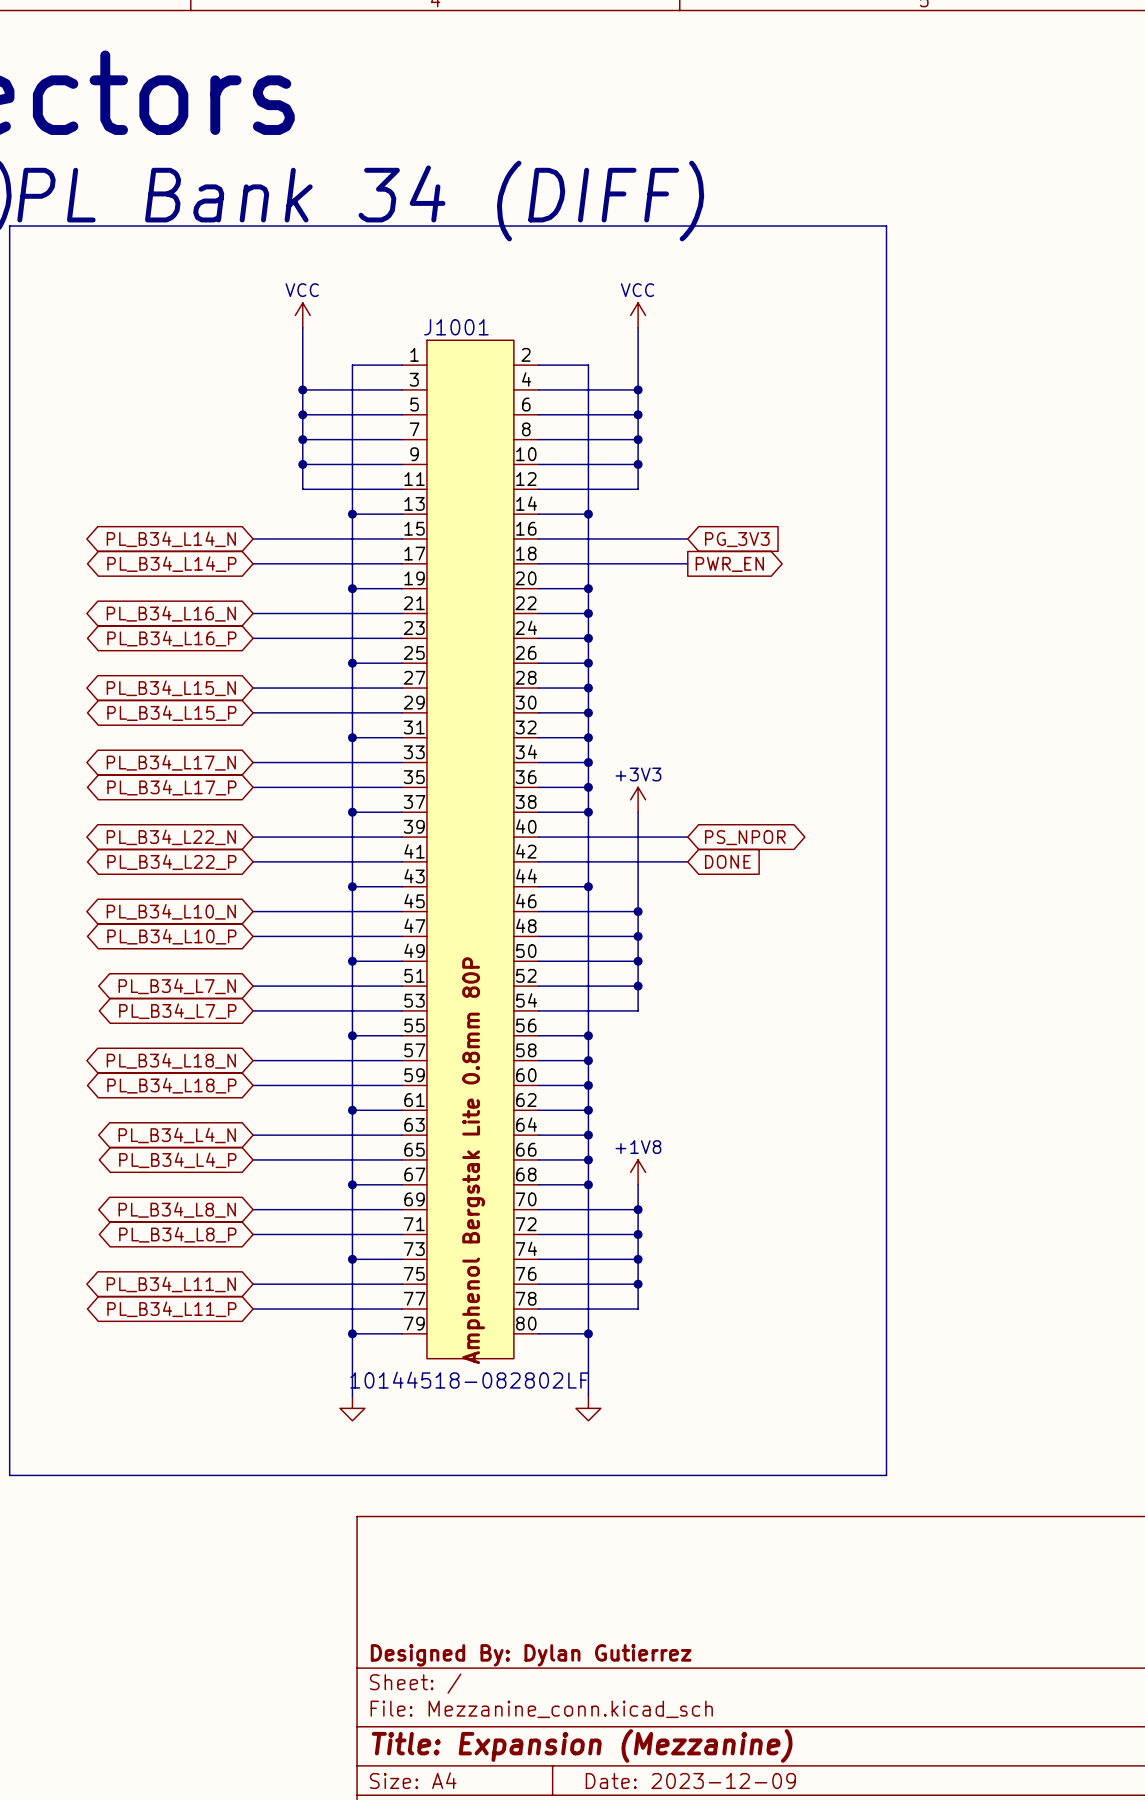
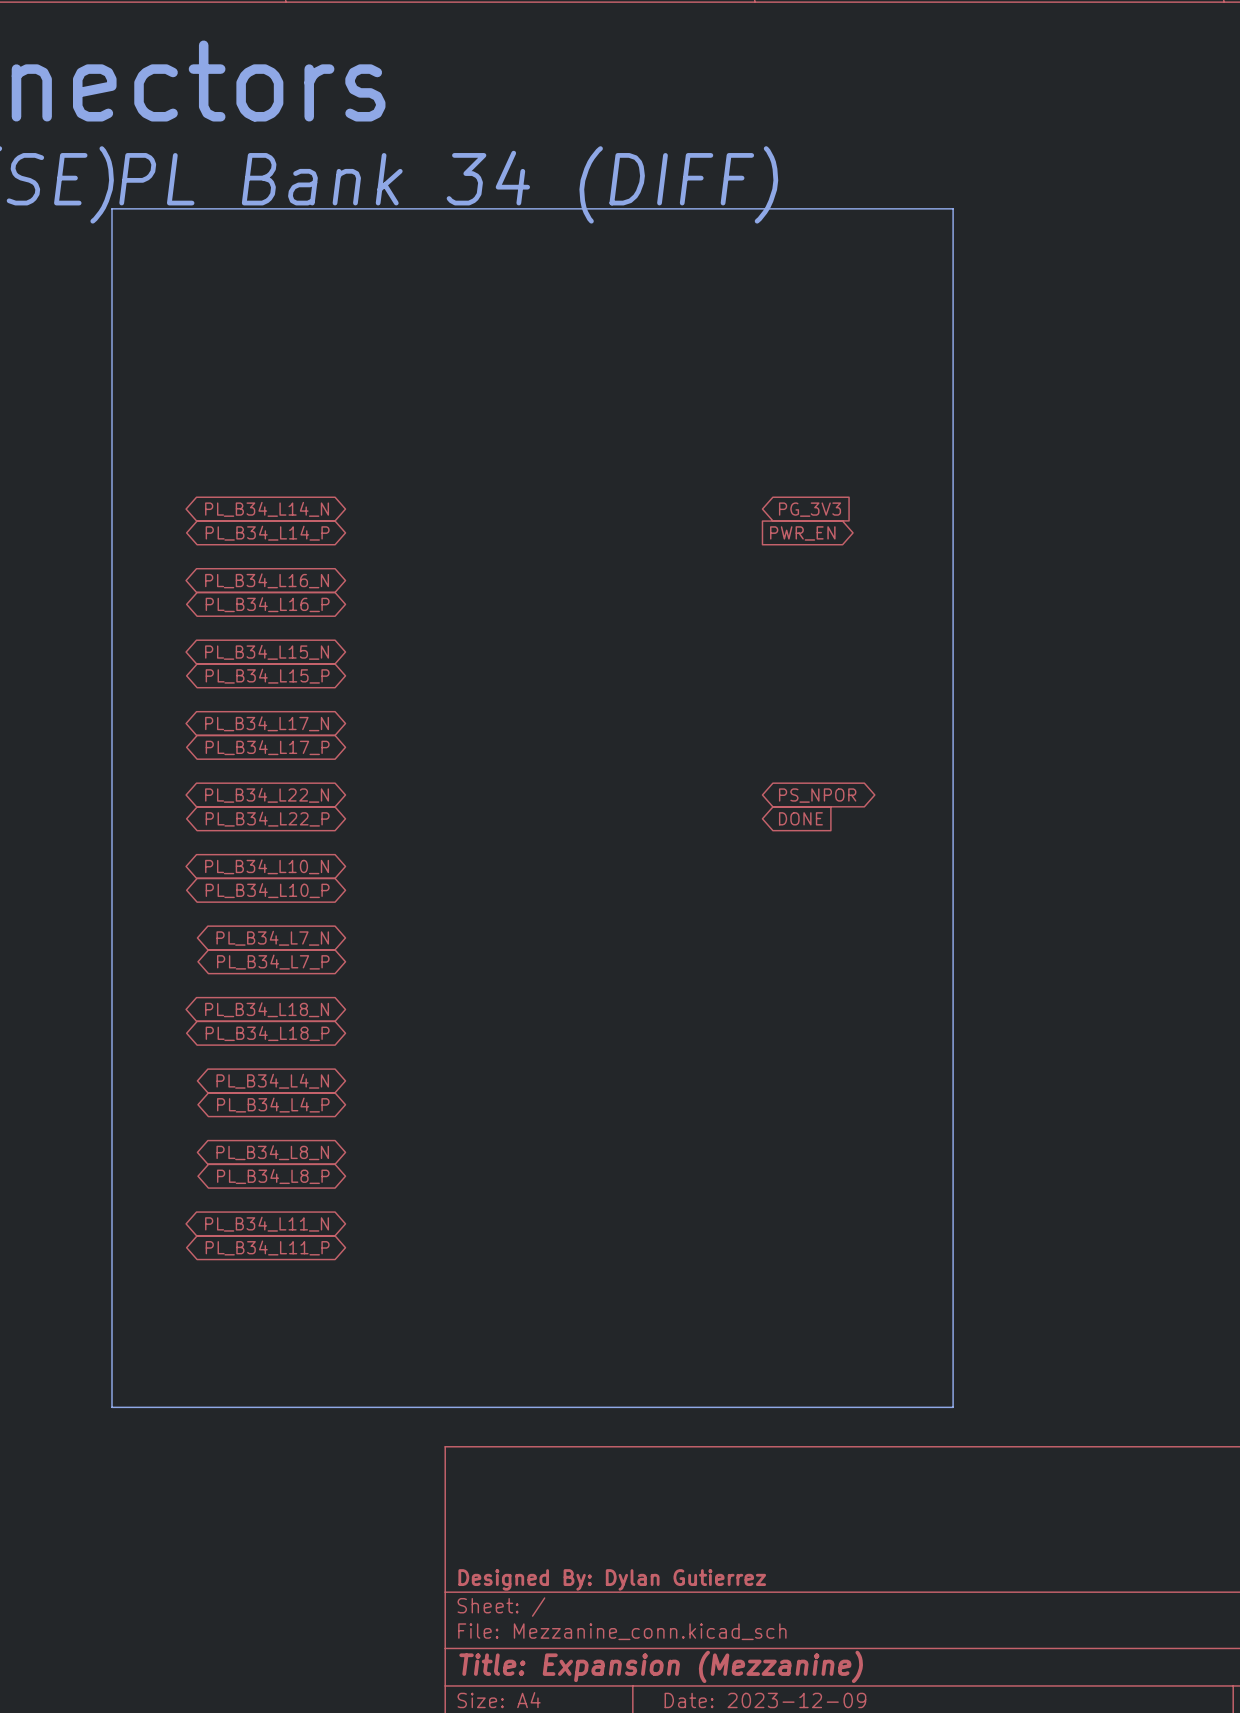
power symbol: VCC (302, 315) -> none
power symbol: VCC (638, 315) -> none
wire: (302, 327) (302, 489) (402, 489) -> none
wire: (638, 327) (638, 489) (538, 489) -> none
wire: (402, 365) (352, 365) (352, 1395) -> none
wire: (538, 365) (588, 365) (588, 1395) -> none
wire: (302, 389) (402, 389) -> none
junction: (302, 389) -> none
wire: (538, 389) (638, 389) -> none
junction: (638, 389) -> none
wire: (302, 414) (402, 414) -> none
junction: (302, 414) -> none
wire: (538, 414) (638, 414) -> none
junction: (638, 414) -> none
wire: (302, 439) (402, 439) -> none
junction: (302, 439) -> none
wire: (538, 439) (638, 439) -> none
junction: (638, 439) -> none
wire: (302, 464) (402, 464) -> none
junction: (302, 464) -> none
wire: (538, 464) (638, 464) -> none
junction: (638, 464) -> none
wire: (352, 514) (402, 514) -> none
junction: (352, 514) -> none
wire: (538, 514) (588, 514) -> none
junction: (588, 514) -> none
wire: (253, 538) (402, 538) -> none
wire: (538, 538) (687, 538) -> none
wire: (253, 563) (402, 563) -> none
wire: (538, 563) (687, 563) -> none
wire: (352, 588) (402, 588) -> none
junction: (352, 588) -> none
wire: (538, 588) (588, 588) -> none
junction: (588, 588) -> none
wire: (253, 613) (402, 613) -> none
wire: (538, 613) (588, 613) -> none
junction: (588, 613) -> none
wire: (253, 638) (402, 638) -> none
wire: (538, 638) (588, 638) -> none
junction: (588, 638) -> none
wire: (352, 663) (402, 663) -> none
junction: (352, 663) -> none
wire: (538, 663) (588, 663) -> none
junction: (588, 663) -> none
wire: (253, 688) (402, 688) -> none
wire: (538, 688) (588, 688) -> none
junction: (588, 688) -> none
wire: (253, 712) (402, 712) -> none
wire: (538, 712) (588, 712) -> none
junction: (588, 712) -> none
wire: (352, 737) (402, 737) -> none
junction: (352, 737) -> none
wire: (538, 737) (588, 737) -> none
junction: (588, 737) -> none
wire: (253, 762) (402, 762) -> none
wire: (538, 762) (588, 762) -> none
junction: (588, 762) -> none
wire: (253, 787) (402, 787) -> none
wire: (538, 787) (588, 787) -> none
junction: (588, 787) -> none
power symbol: +3V3 (638, 799) -> none
wire: (352, 812) (402, 812) -> none
junction: (352, 812) -> none
wire: (538, 812) (588, 812) -> none
junction: (588, 812) -> none
wire: (638, 812) (638, 1010) (538, 1010) -> none
wire: (253, 837) (402, 837) -> none
wire: (538, 837) (687, 837) -> none
J1001: 10144518-082802LF (470, 849) -> none
wire: (253, 861) (402, 861) -> none
wire: (538, 861) (687, 861) -> none
wire: (352, 886) (402, 886) -> none
junction: (352, 886) -> none
wire: (538, 886) (588, 886) -> none
junction: (588, 886) -> none
wire: (253, 911) (402, 911) -> none
wire: (538, 911) (638, 911) -> none
junction: (638, 911) -> none
wire: (253, 936) (402, 936) -> none
wire: (538, 936) (638, 936) -> none
junction: (638, 936) -> none
wire: (352, 961) (402, 961) -> none
junction: (352, 961) -> none
wire: (538, 961) (638, 961) -> none
junction: (638, 961) -> none
wire: (253, 986) (402, 986) -> none
wire: (538, 986) (638, 986) -> none
junction: (638, 986) -> none
wire: (253, 1010) (402, 1010) -> none
wire: (352, 1035) (402, 1035) -> none
junction: (352, 1035) -> none
wire: (538, 1035) (588, 1035) -> none
junction: (588, 1035) -> none
wire: (253, 1060) (402, 1060) -> none
wire: (538, 1060) (588, 1060) -> none
junction: (588, 1060) -> none
wire: (253, 1085) (402, 1085) -> none
wire: (538, 1085) (588, 1085) -> none
junction: (588, 1085) -> none
wire: (352, 1110) (402, 1110) -> none
junction: (352, 1110) -> none
wire: (538, 1110) (588, 1110) -> none
junction: (588, 1110) -> none
wire: (253, 1135) (402, 1135) -> none
wire: (538, 1135) (588, 1135) -> none
junction: (588, 1135) -> none
wire: (253, 1159) (402, 1159) -> none
wire: (538, 1159) (588, 1159) -> none
junction: (588, 1159) -> none
power symbol: +1V8 (638, 1172) -> none
wire: (352, 1184) (402, 1184) -> none
junction: (352, 1184) -> none
wire: (538, 1184) (588, 1184) -> none
junction: (588, 1184) -> none
wire: (638, 1184) (638, 1309) (538, 1309) -> none
wire: (253, 1209) (402, 1209) -> none
wire: (538, 1209) (638, 1209) -> none
junction: (638, 1209) -> none
wire: (253, 1234) (402, 1234) -> none
wire: (538, 1234) (638, 1234) -> none
junction: (638, 1234) -> none
wire: (352, 1259) (402, 1259) -> none
junction: (352, 1259) -> none
wire: (538, 1259) (638, 1259) -> none
junction: (638, 1259) -> none
wire: (253, 1284) (402, 1284) -> none
wire: (538, 1284) (638, 1284) -> none
junction: (638, 1284) -> none
wire: (253, 1309) (402, 1309) -> none
wire: (352, 1333) (402, 1333) -> none
junction: (352, 1333) -> none
wire: (538, 1333) (588, 1333) -> none
junction: (588, 1333) -> none
power symbol: (352, 1408) -> none
power symbol: (588, 1408) -> none

